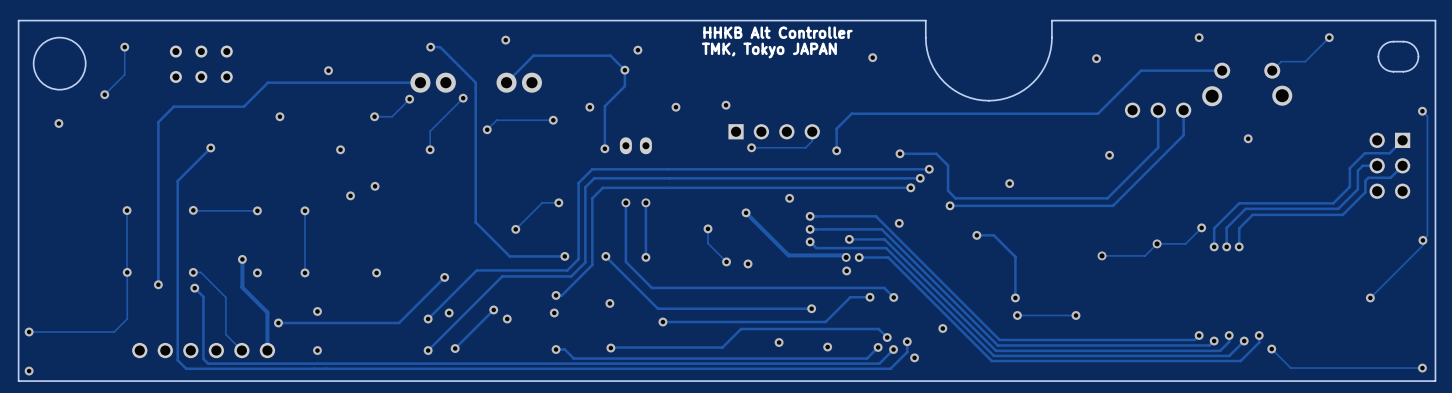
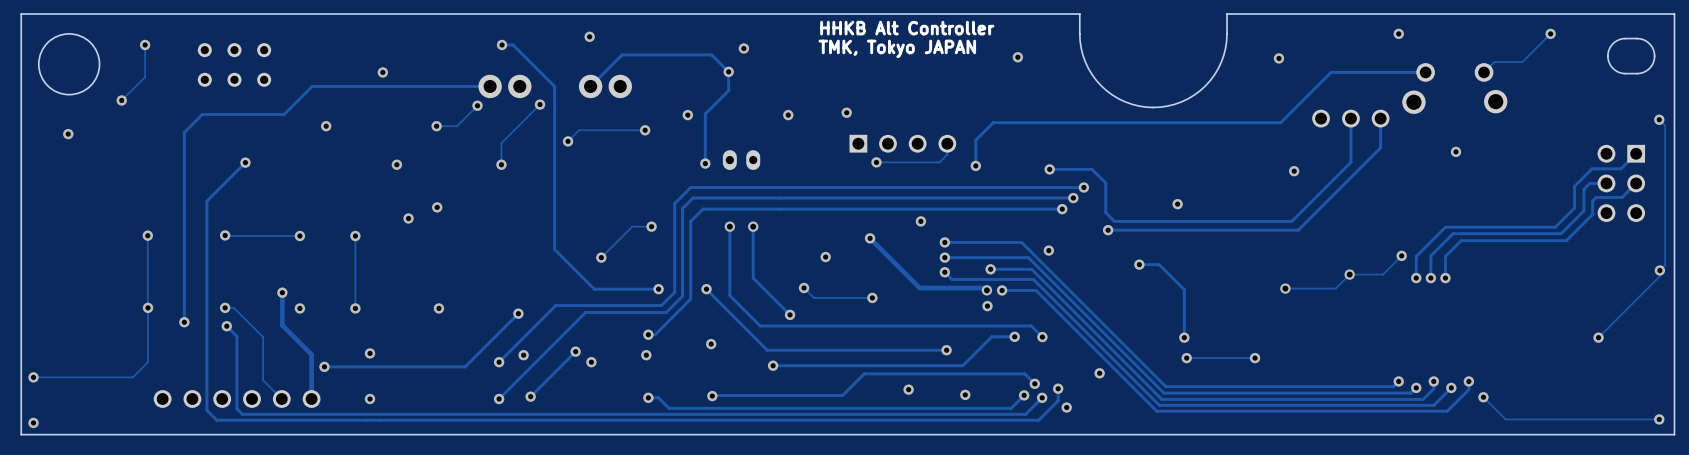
track: (708, 228) (708, 243) (726, 261) -> none
track: (645, 246) (645, 257) -> (753, 278) (790, 314)
track: none -> (804, 288) (813, 297) (872, 297)
via: none -> (804, 288)
via: (645, 257) -> none
via: (726, 261) -> none
via: none -> (790, 314)

